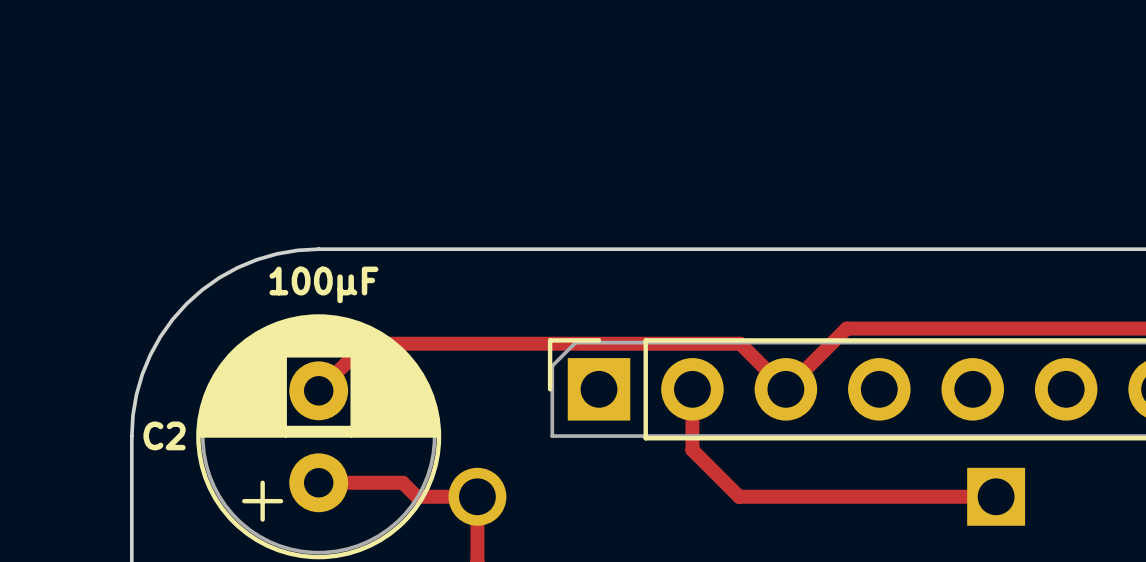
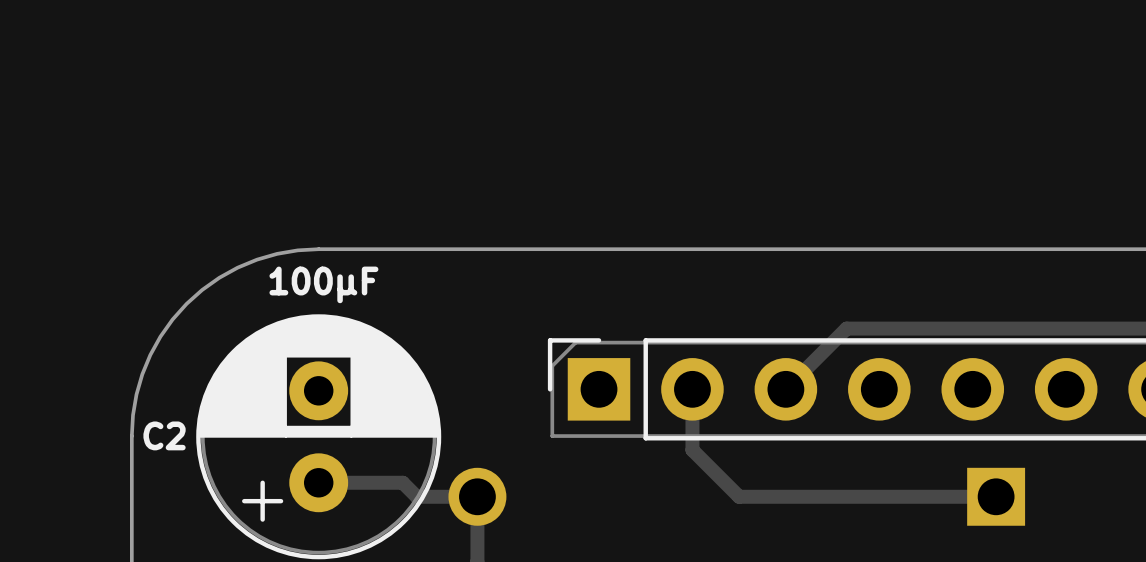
track: (785, 389) (740, 343) (365, 343) (318, 390) -> none

